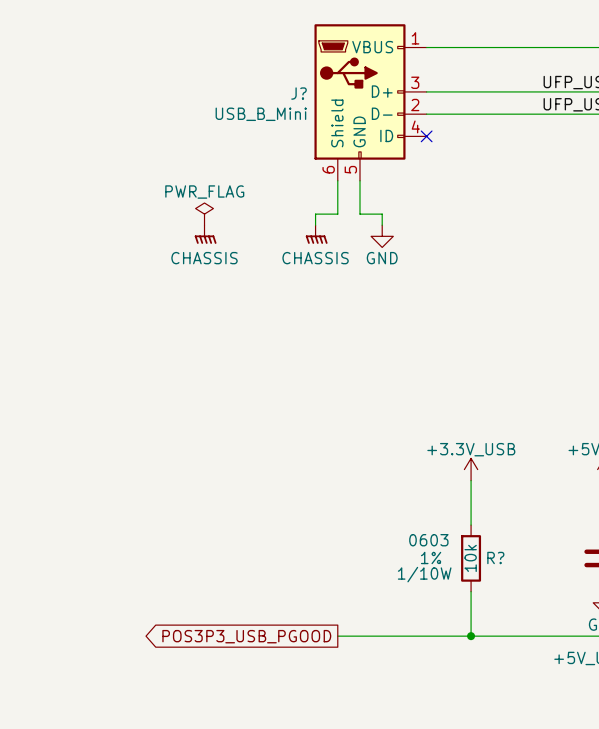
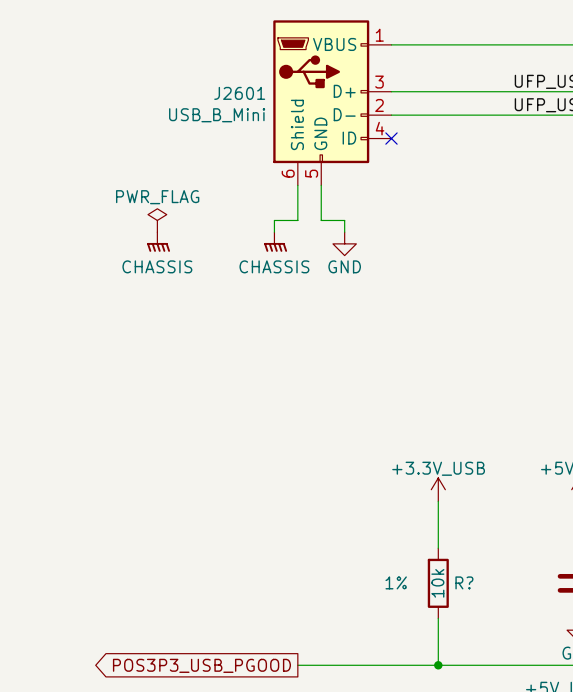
J? name: J? (299, 93) -> J2601 (239, 93)
R? text: 0603 (428, 540) -> none
R? text: 1/10W (424, 574) -> none

